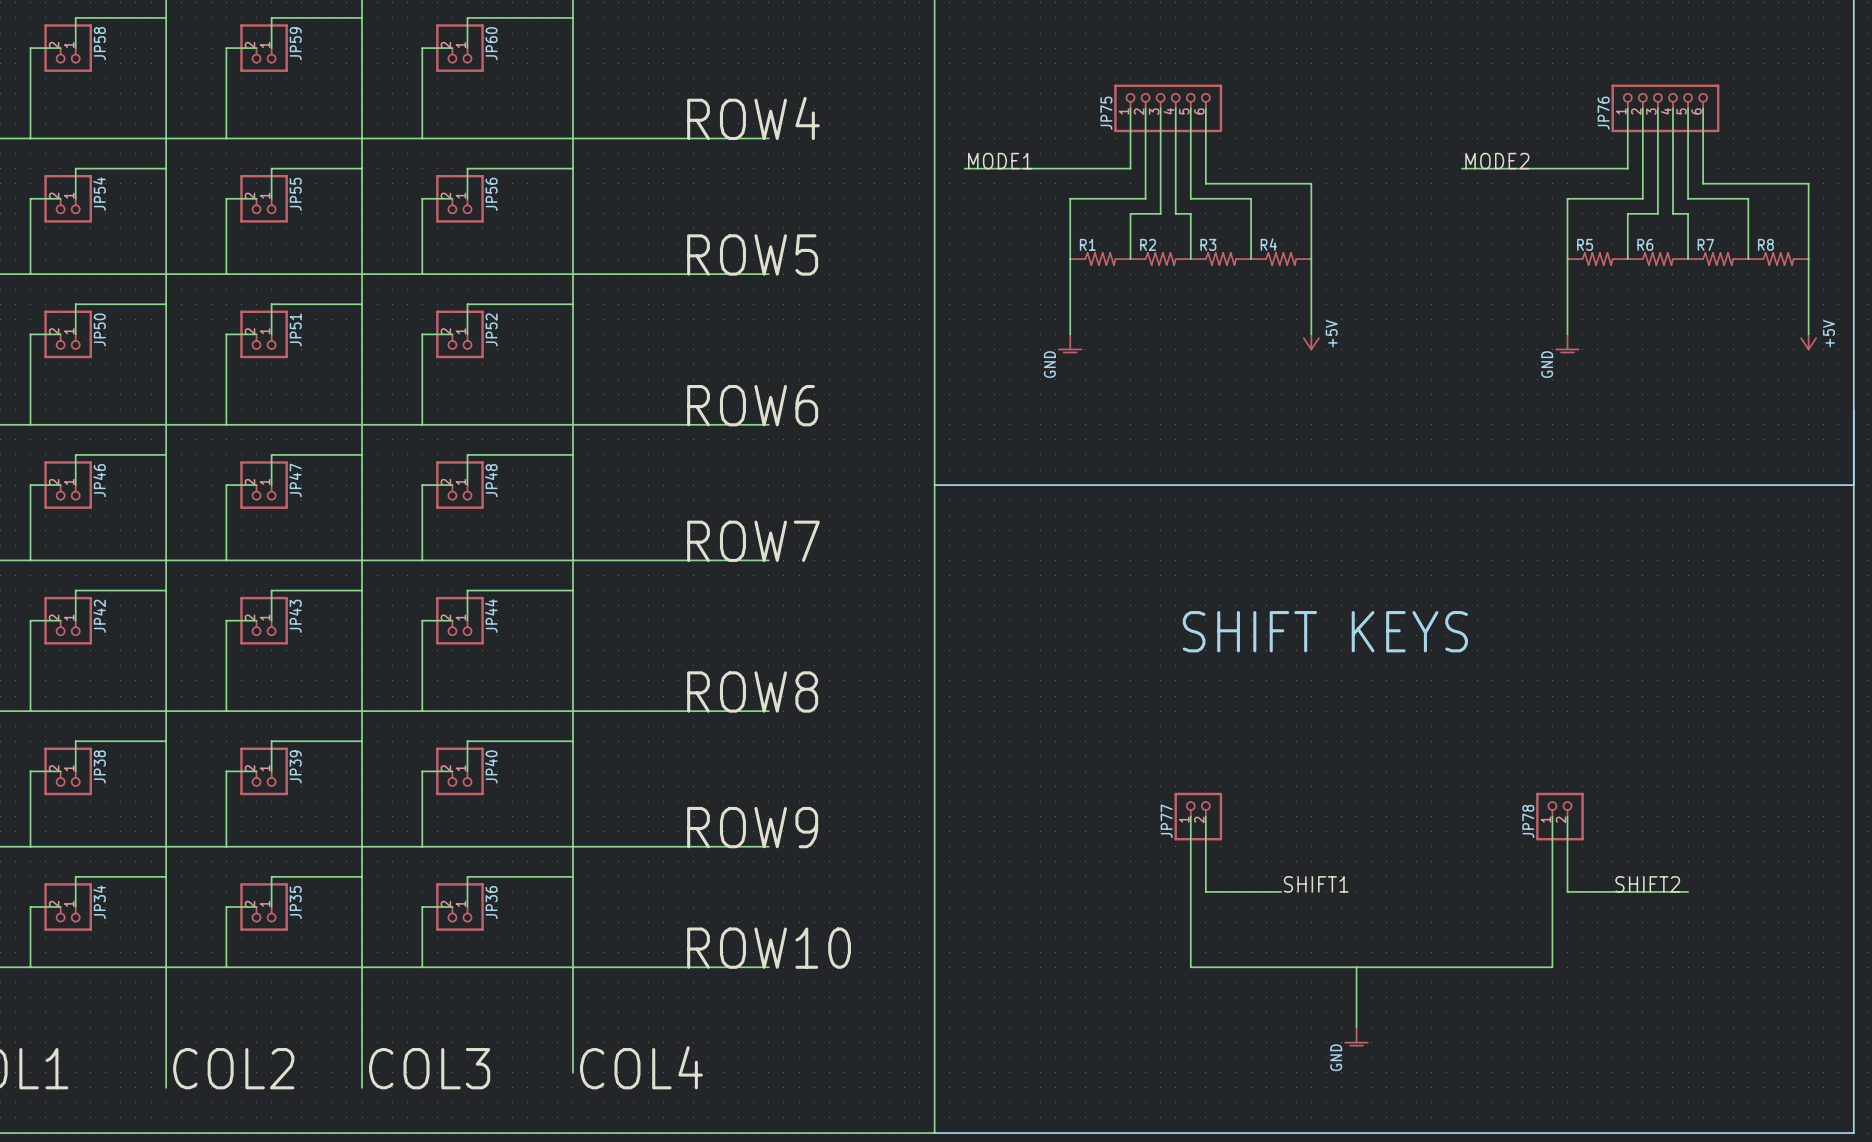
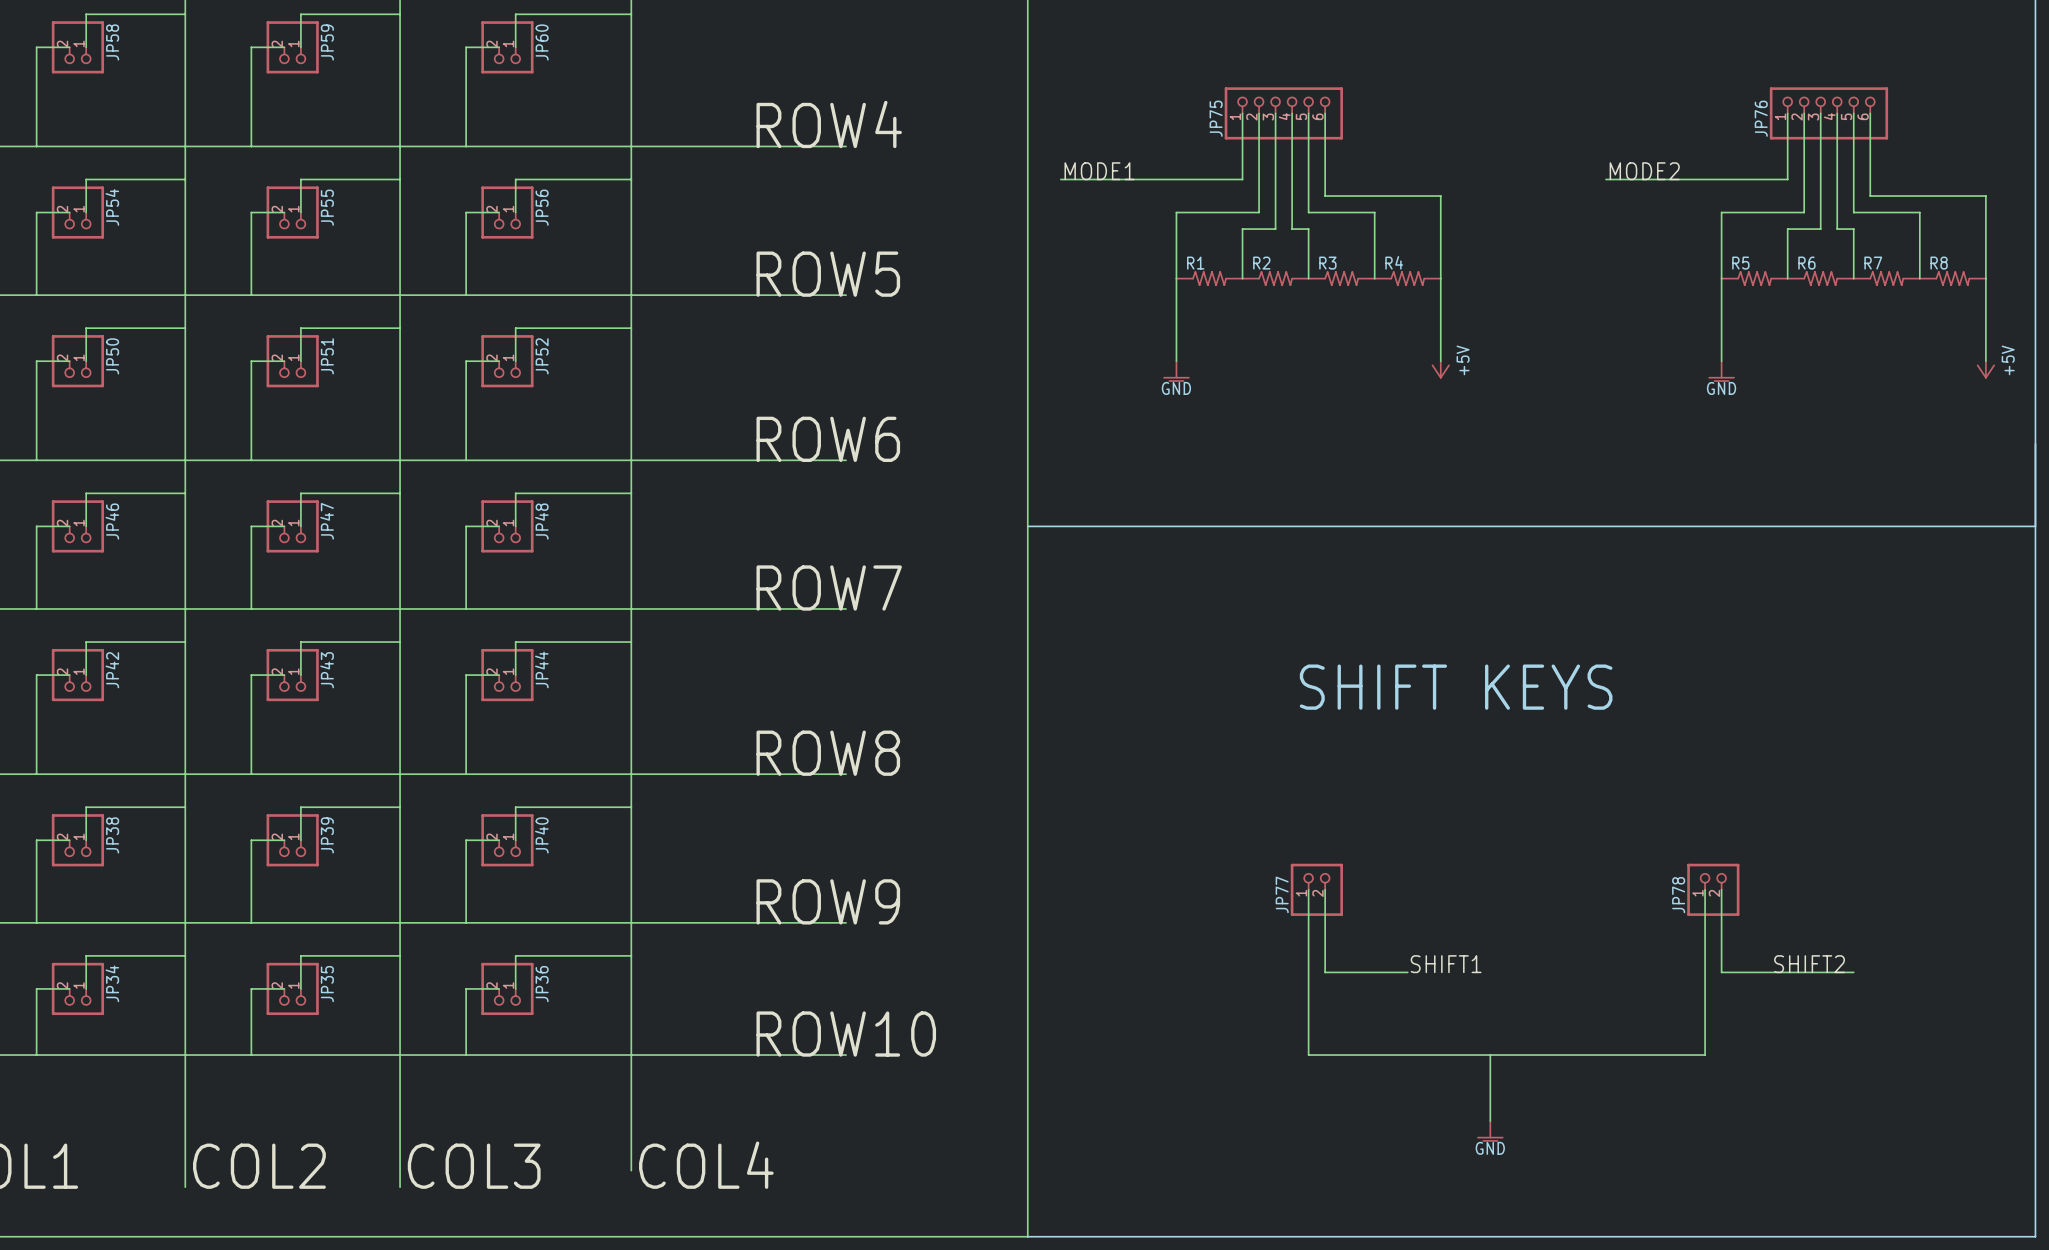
power symbol text rotation: 0° (1049, 364) -> 90° clockwise (1176, 388)
power symbol text rotation: 0° (1547, 364) -> 90° clockwise (1721, 388)
power symbol text rotation: 0° (1336, 1057) -> 90° clockwise (1490, 1148)

